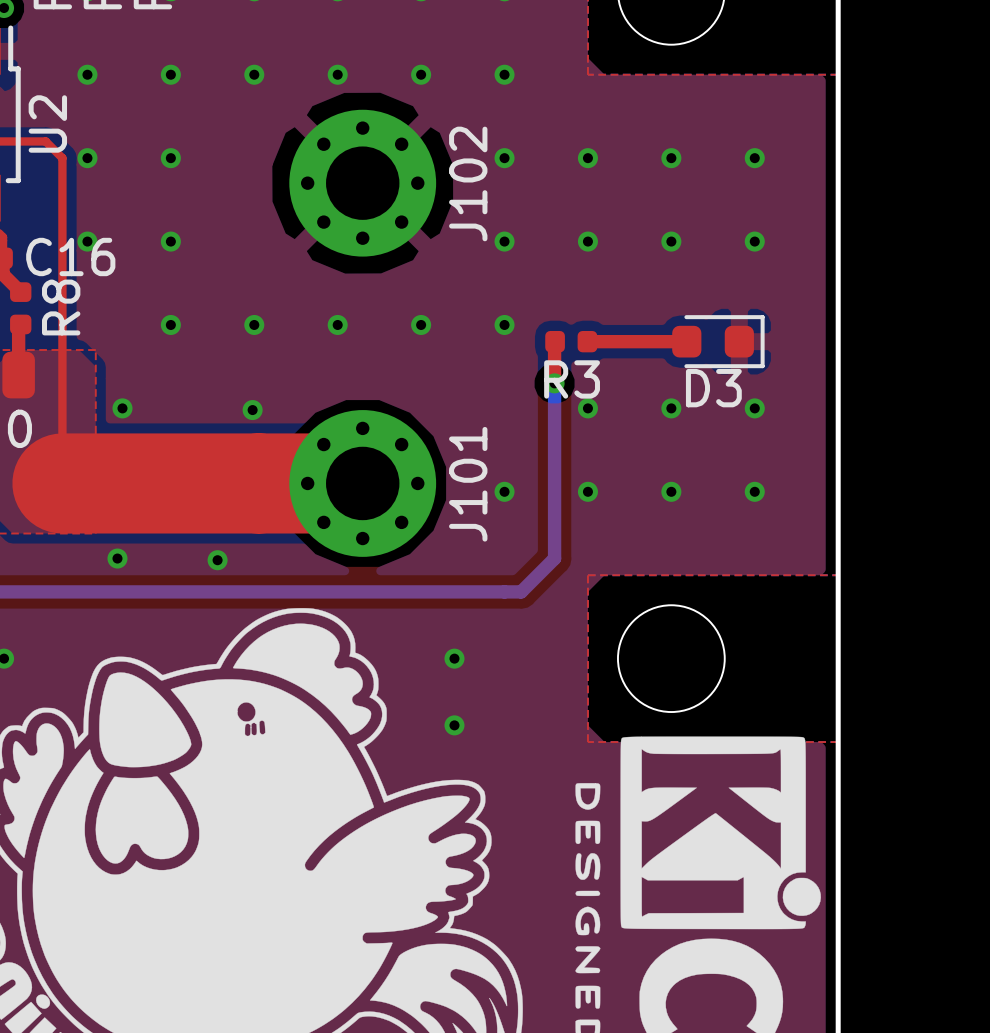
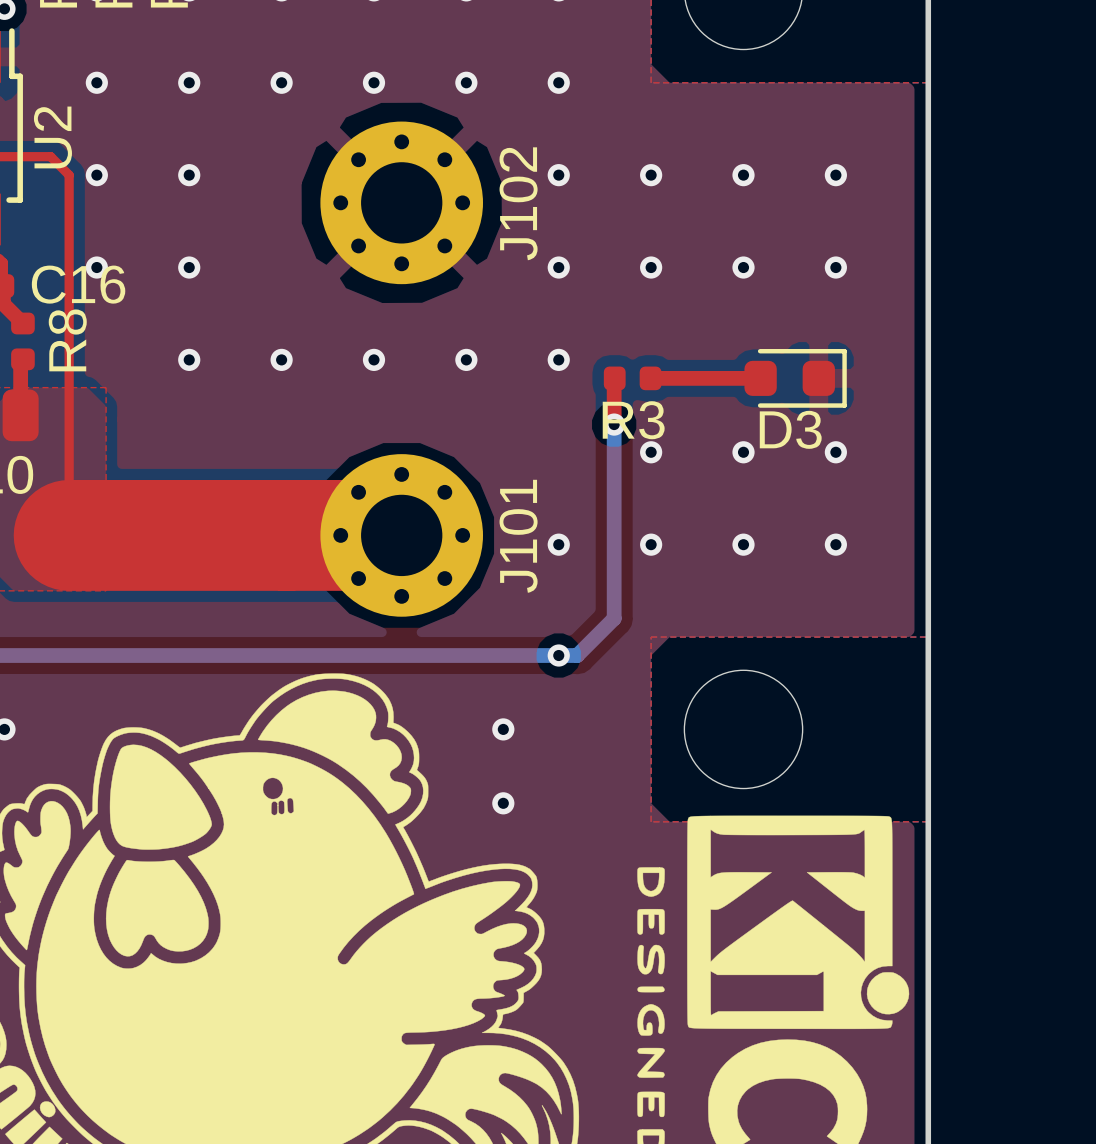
via: (122, 408) -> none
via: (252, 410) -> none
via: (117, 558) -> none
via: (217, 560) -> none
via: none -> (558, 655)

